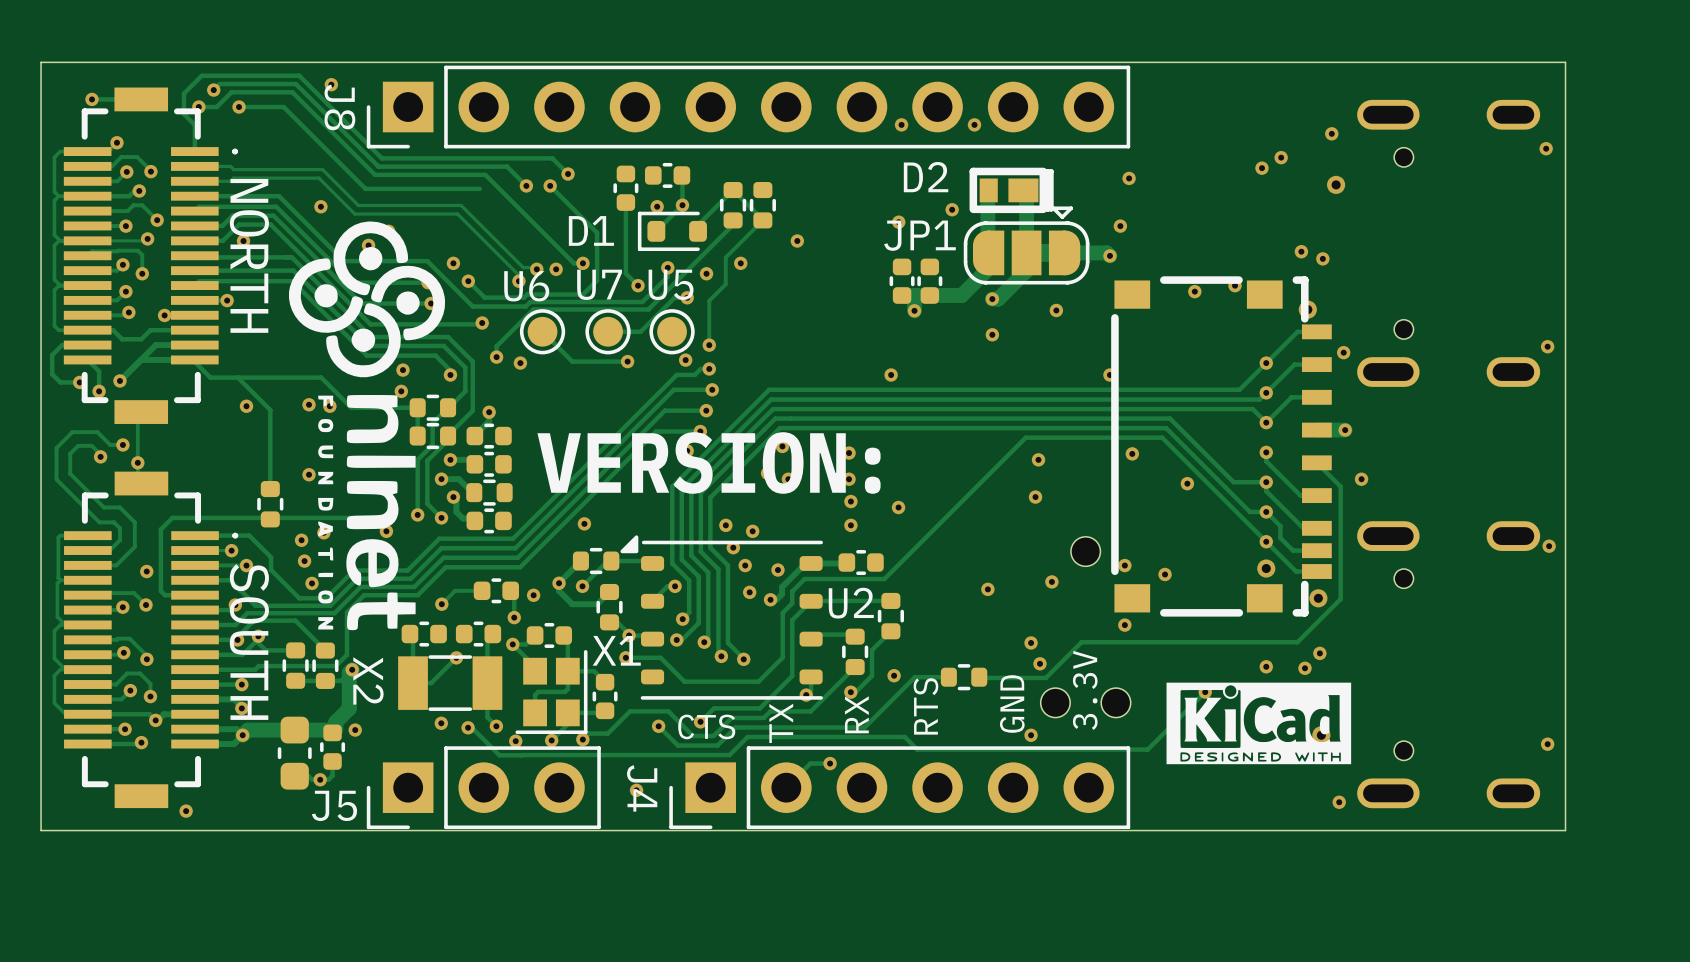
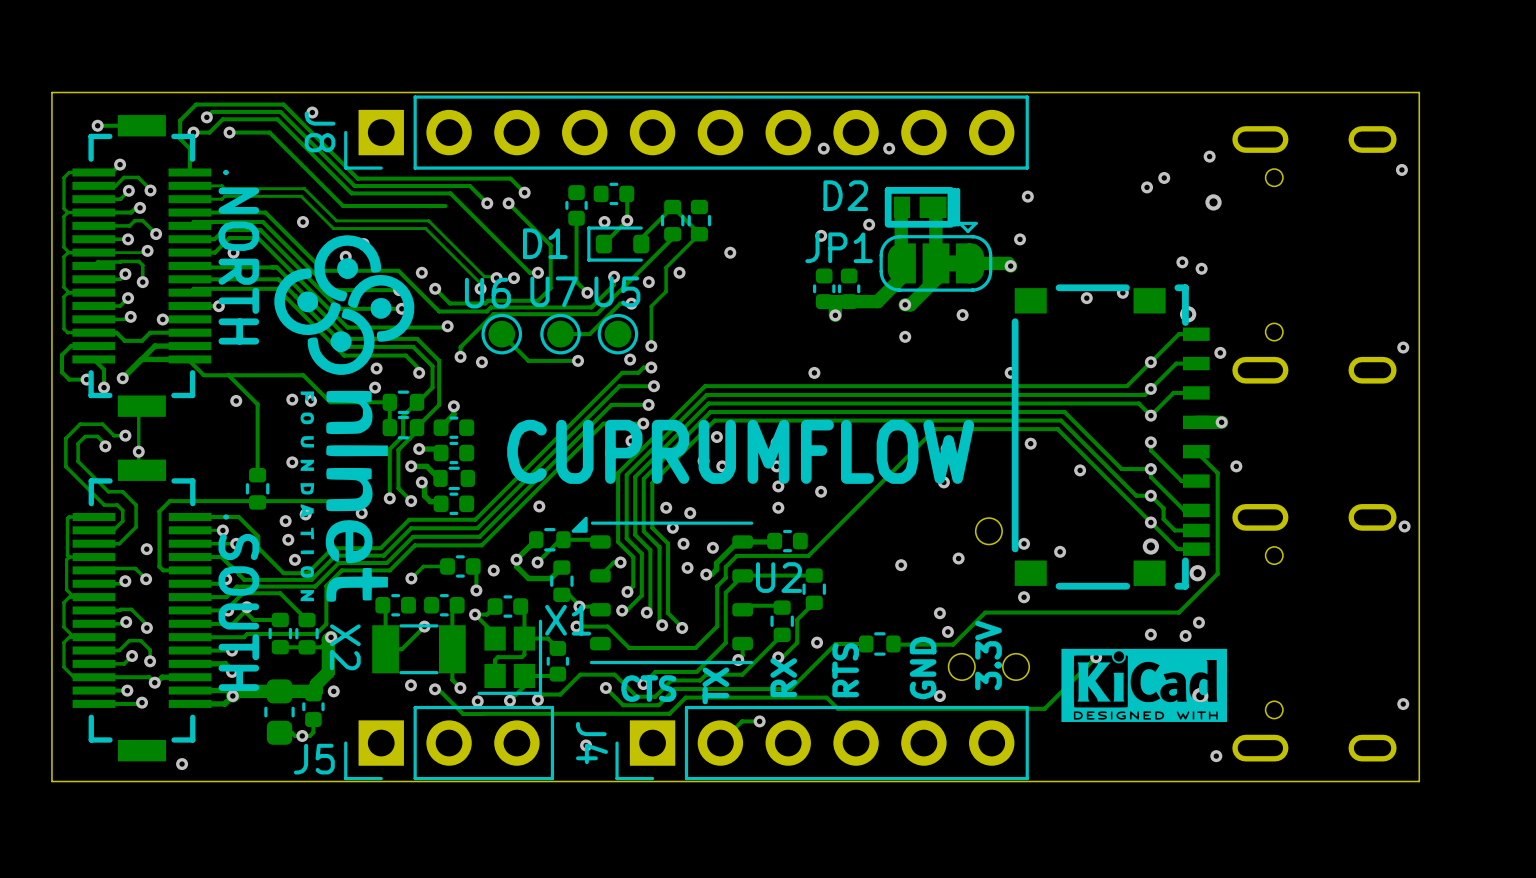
text: VERSION: (709, 462) -> CUPRUMFLOW (740, 451)

